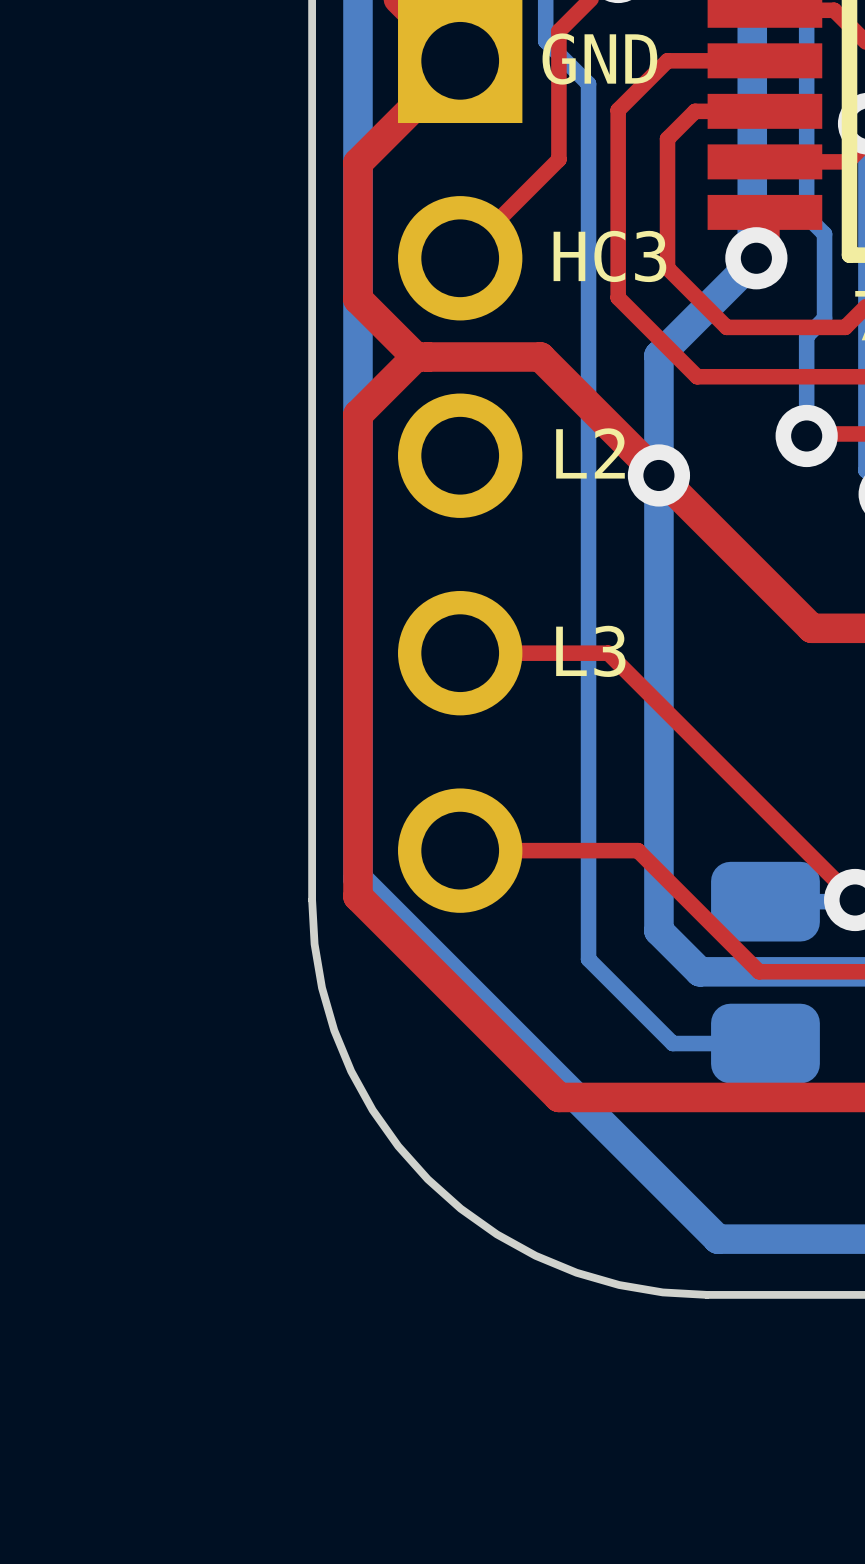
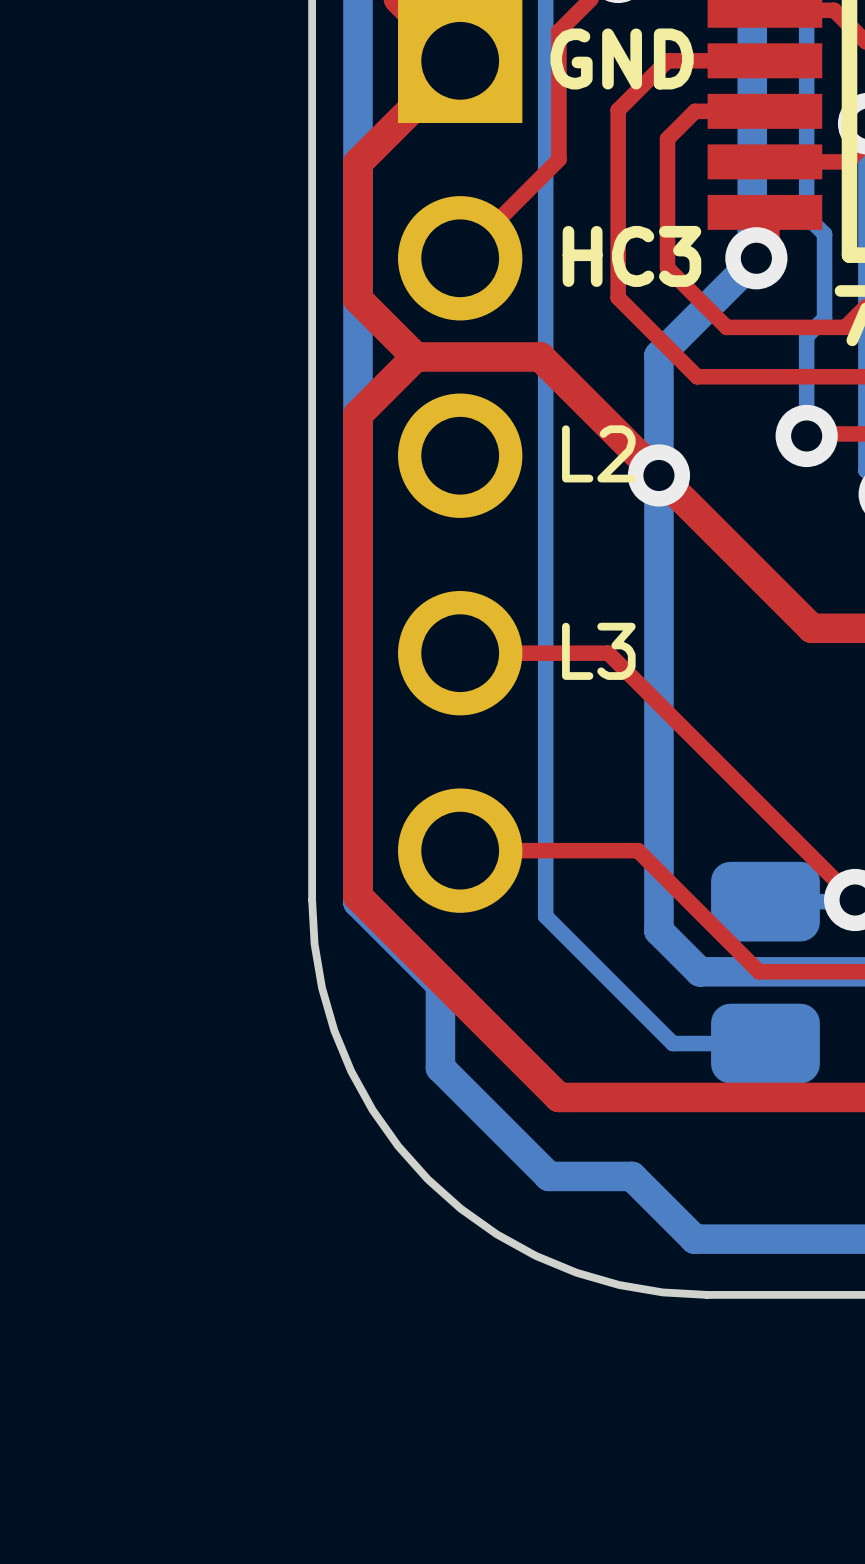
bottom track: (545, 41) (588, 83) (588, 959) -> (545, 41) (545, 916) (588, 959)
bottom track: (357, 879) (717, 1239) -> (357, 879) (357, 902) (440, 984) (440, 1067) (549, 1176) (631, 1176) (694, 1239) (717, 1239)

